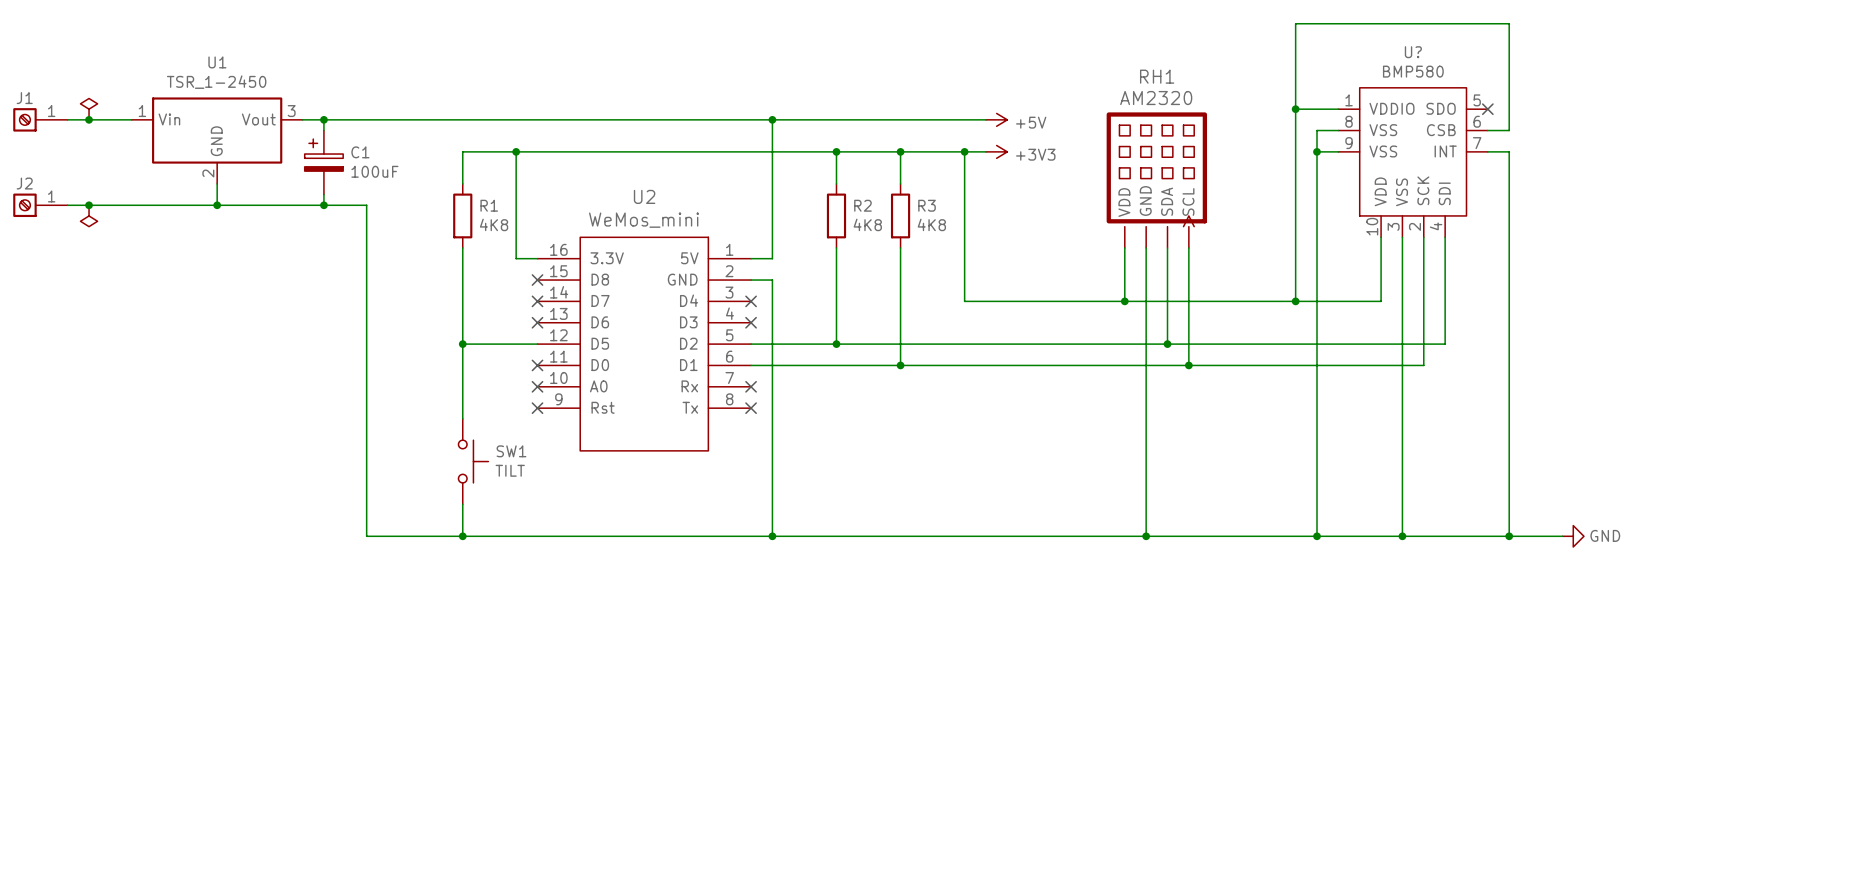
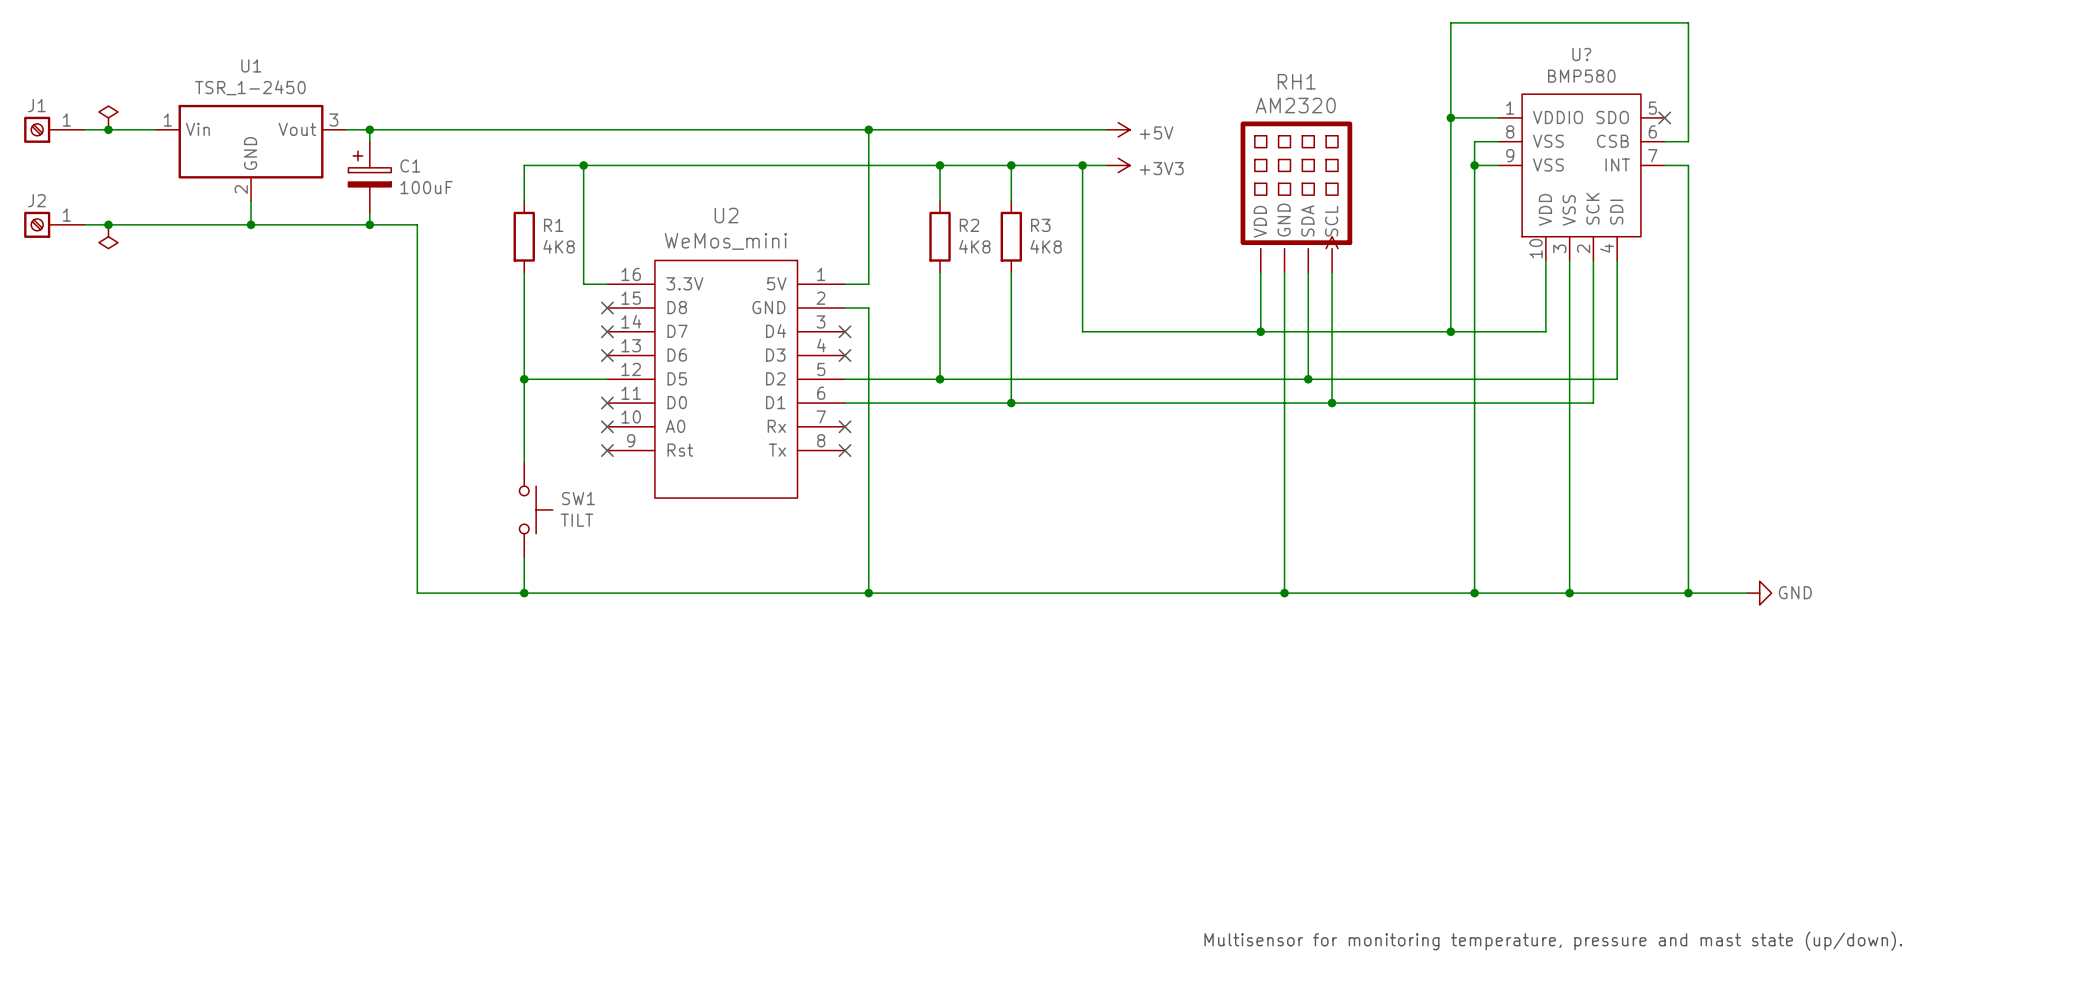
text: none -> Multisensor for monitoring temperature, pressure and mast state (up/down). (1553, 941)

